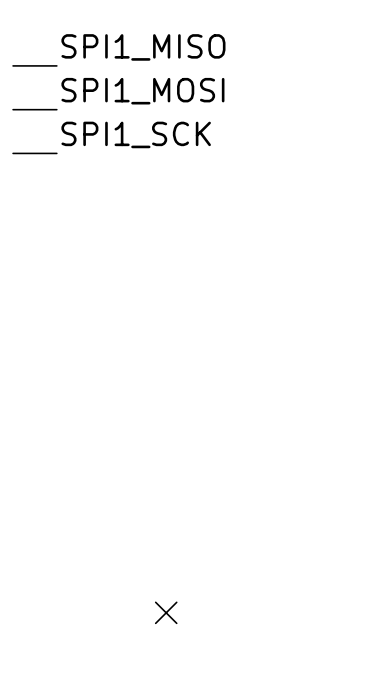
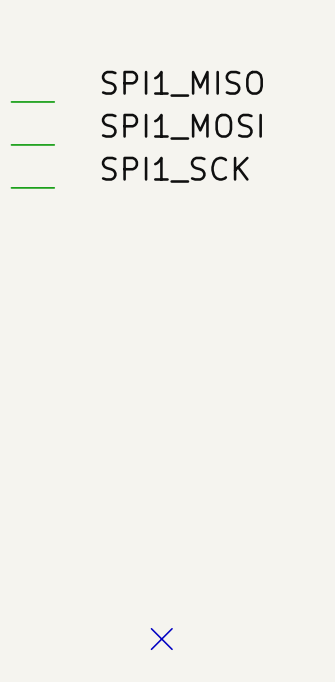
label position: SPI1_MISO (143, 47) -> SPI1_MISO (182, 83)
label position: SPI1_MOSI (142, 91) -> SPI1_MOSI (181, 126)
label position: SPI1_SCK (136, 134) -> SPI1_SCK (175, 169)

